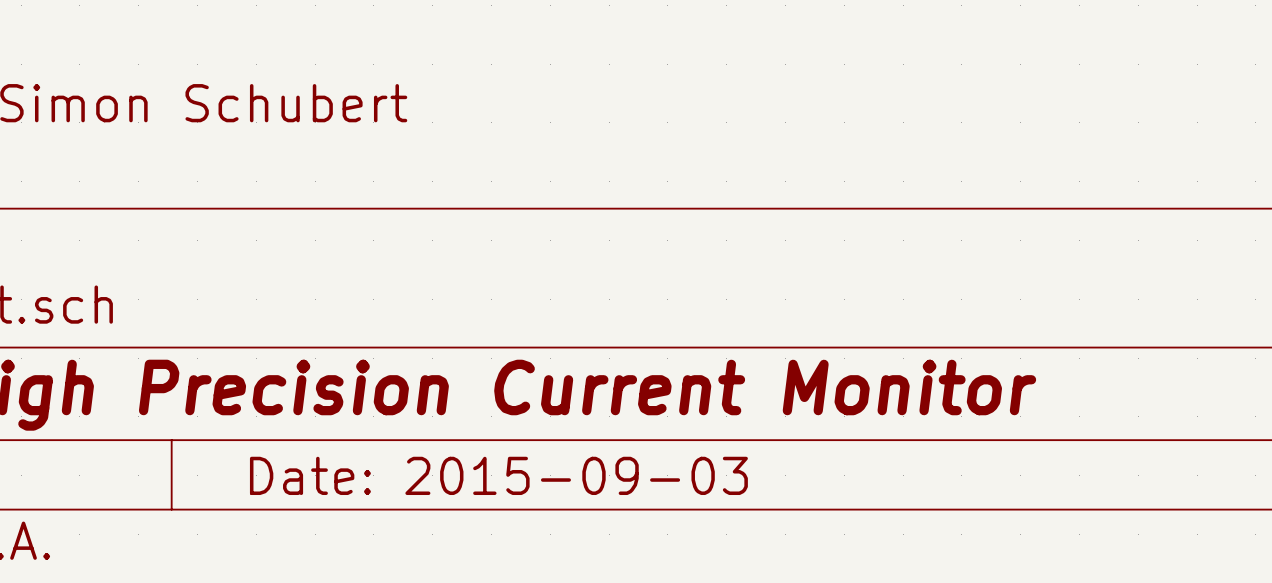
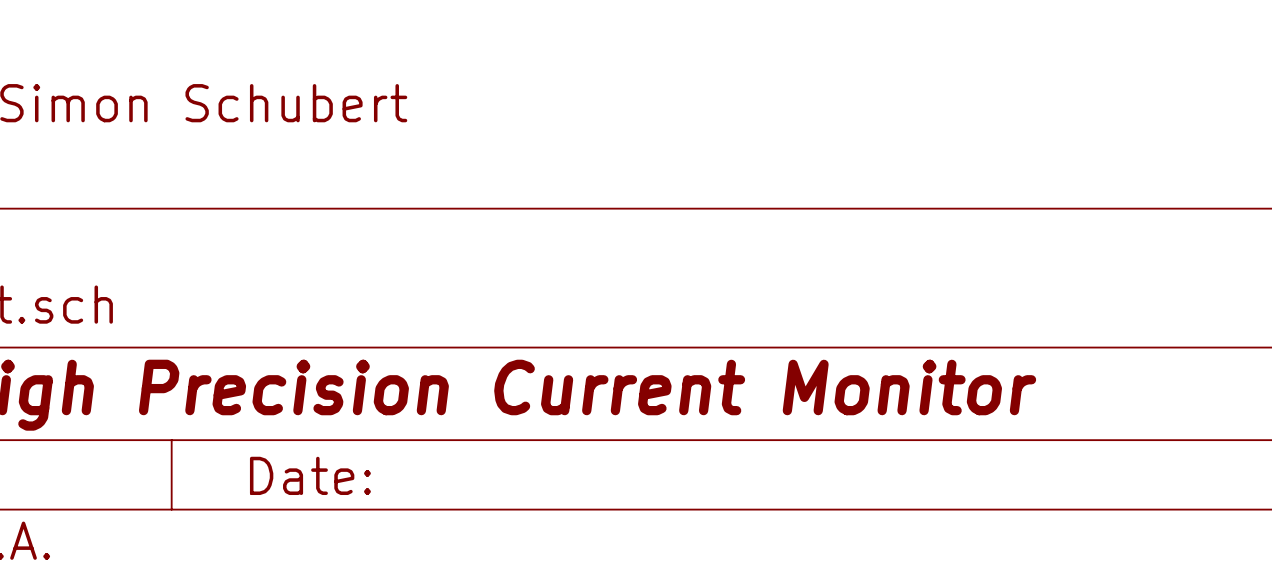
title block: Date: 2015-09-03 (498, 475) -> Date: (310, 475)

